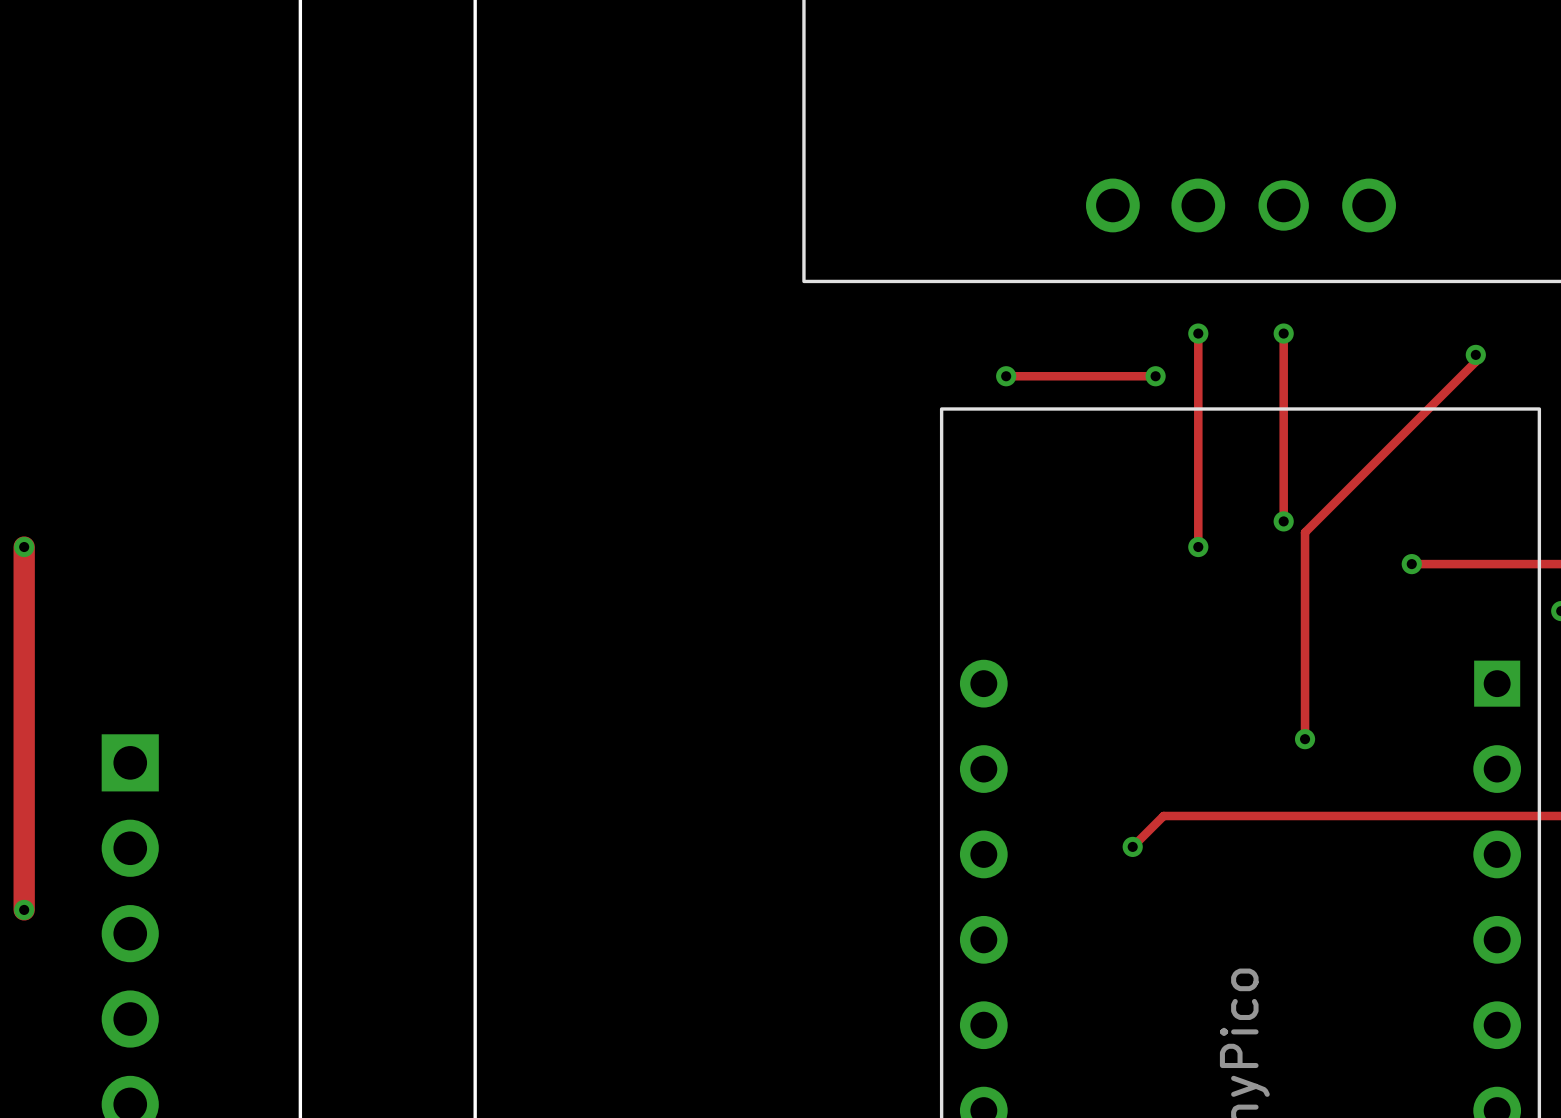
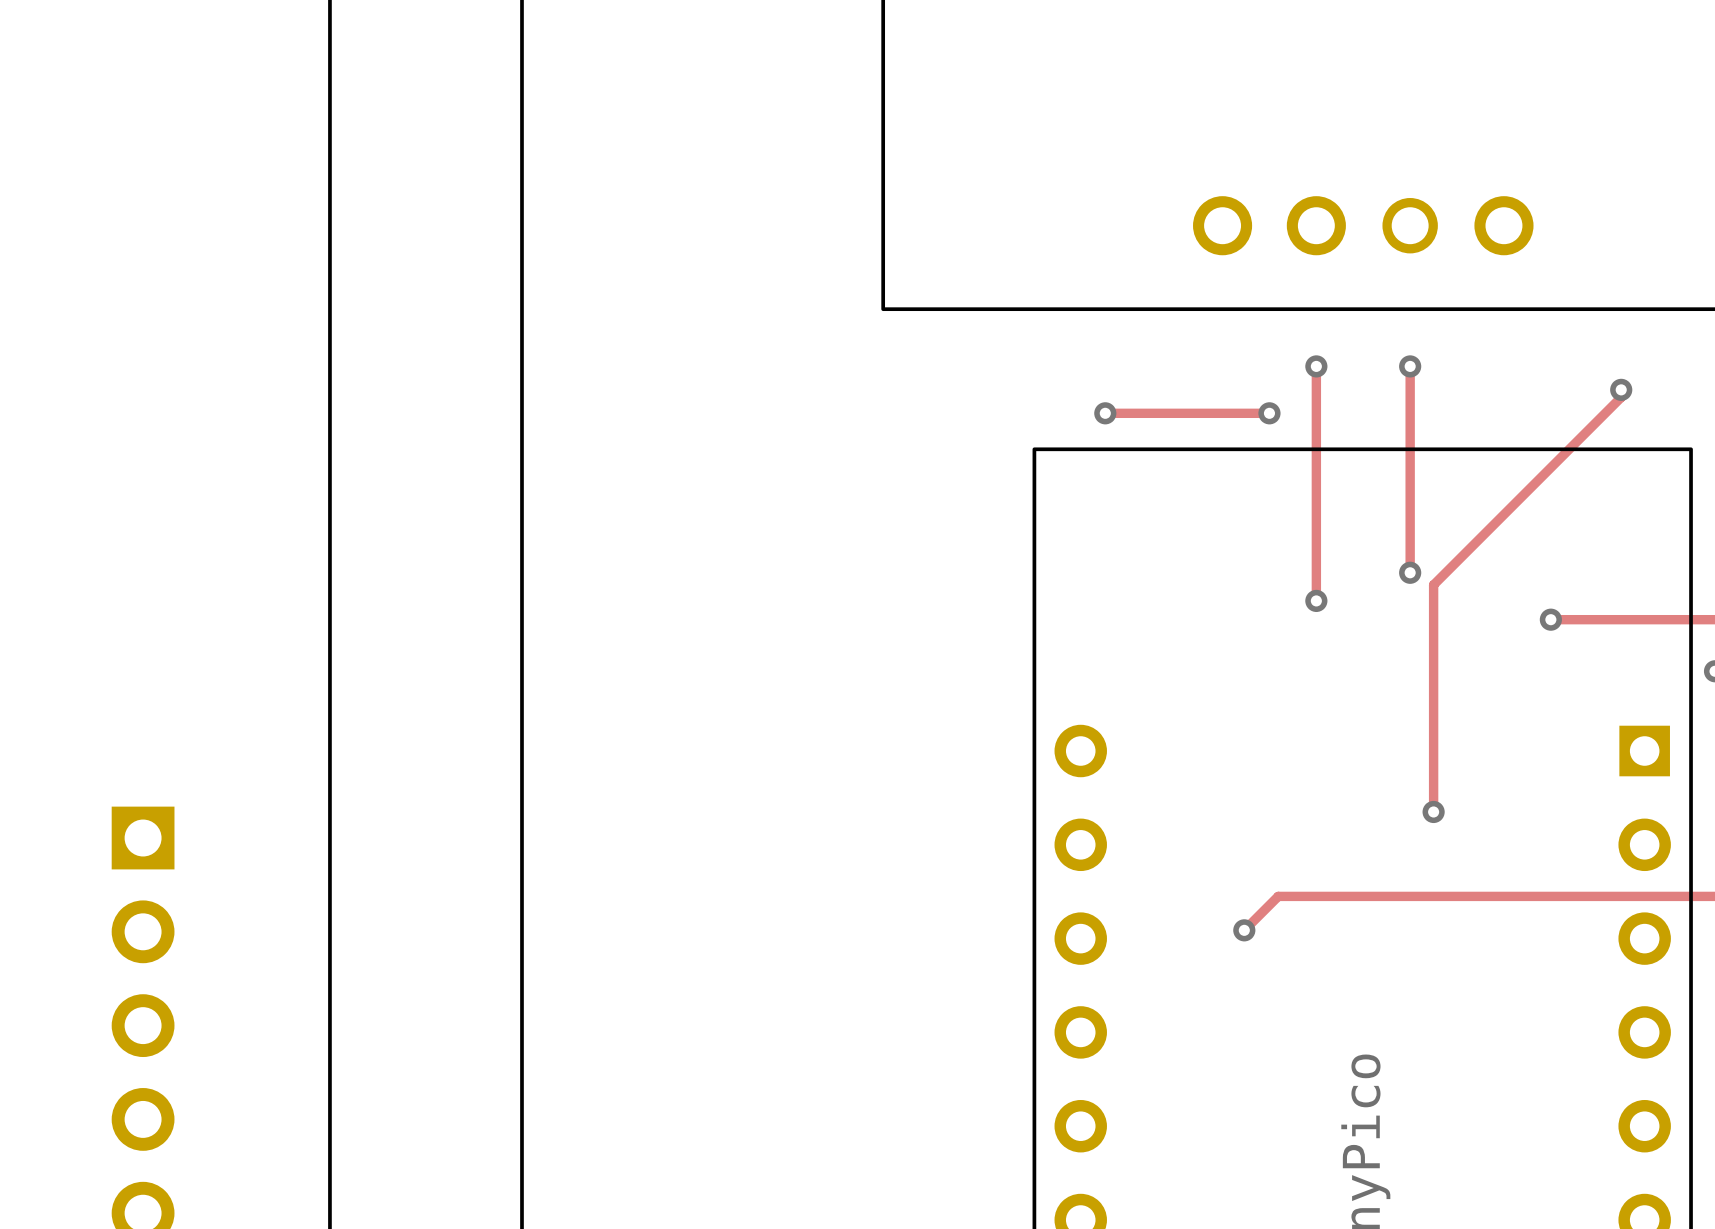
track: (24, 547) (24, 909) -> none
via: (24, 547) -> none
via: (24, 909) -> none

